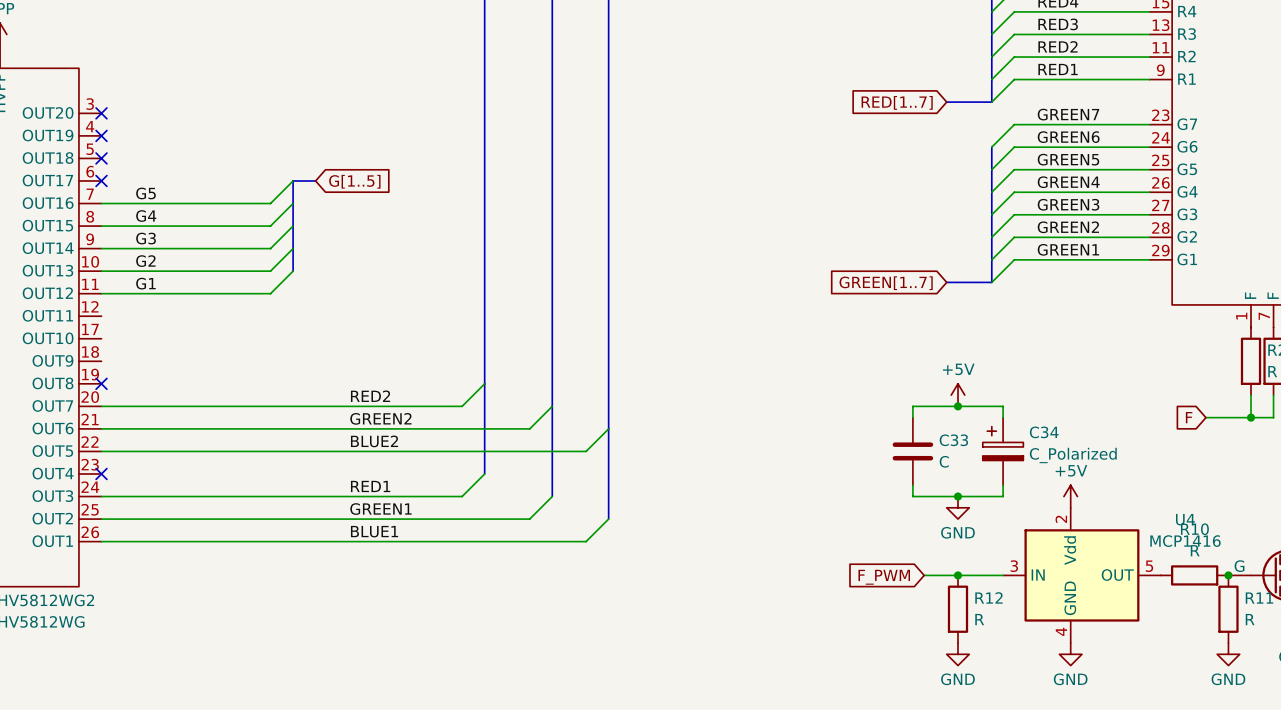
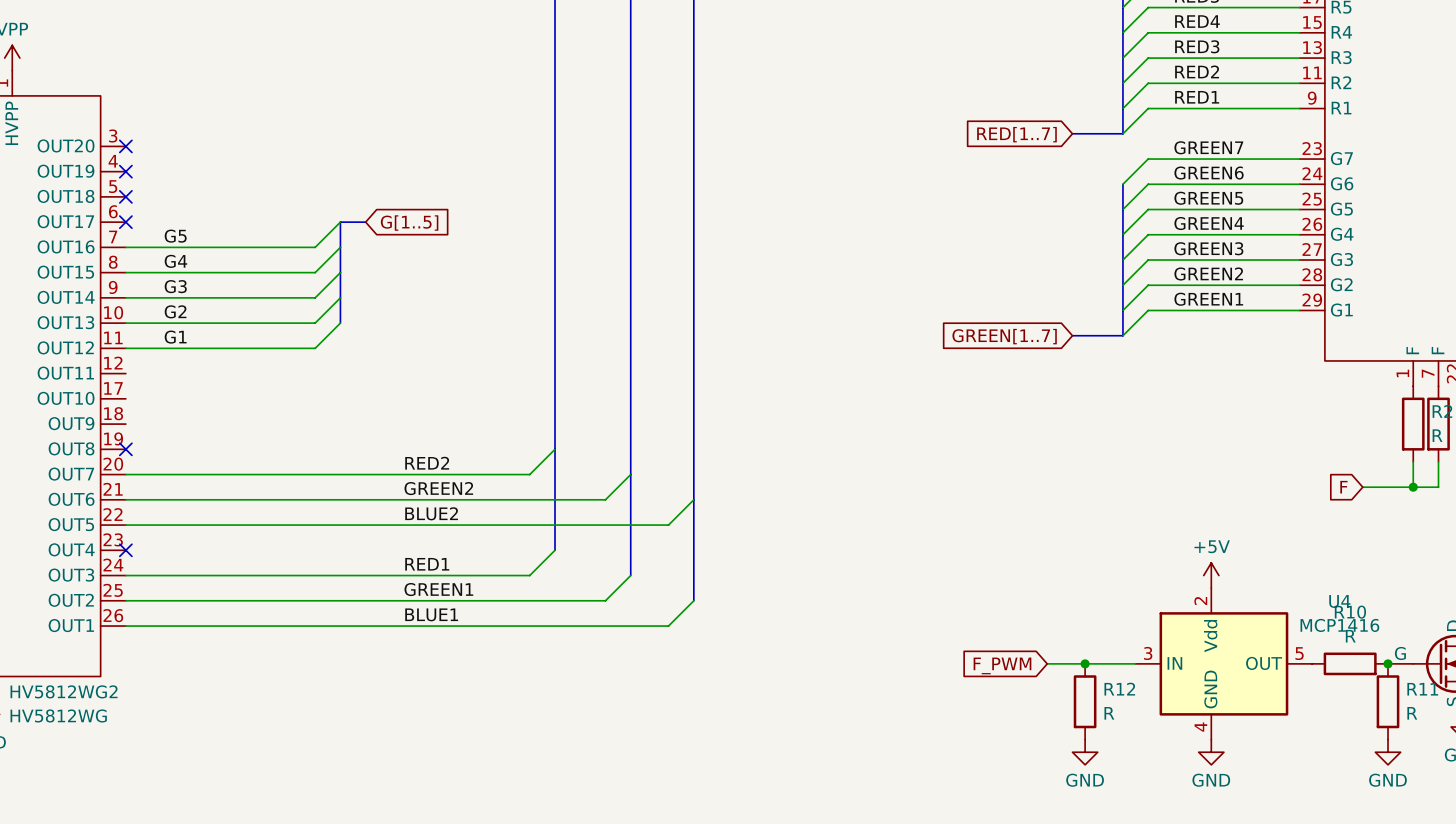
power symbol: +5V (957, 395) -> none
junction: (957, 406) -> none
wire: (912, 417) (912, 406) (1003, 406) (1003, 417) -> none
C33: C (912, 451) -> none
C34: C_Polarized (1003, 451) -> none
wire: (912, 485) (912, 496) (1003, 496) (1003, 485) -> none
junction: (957, 496) -> none
power symbol: GND (957, 507) -> none

